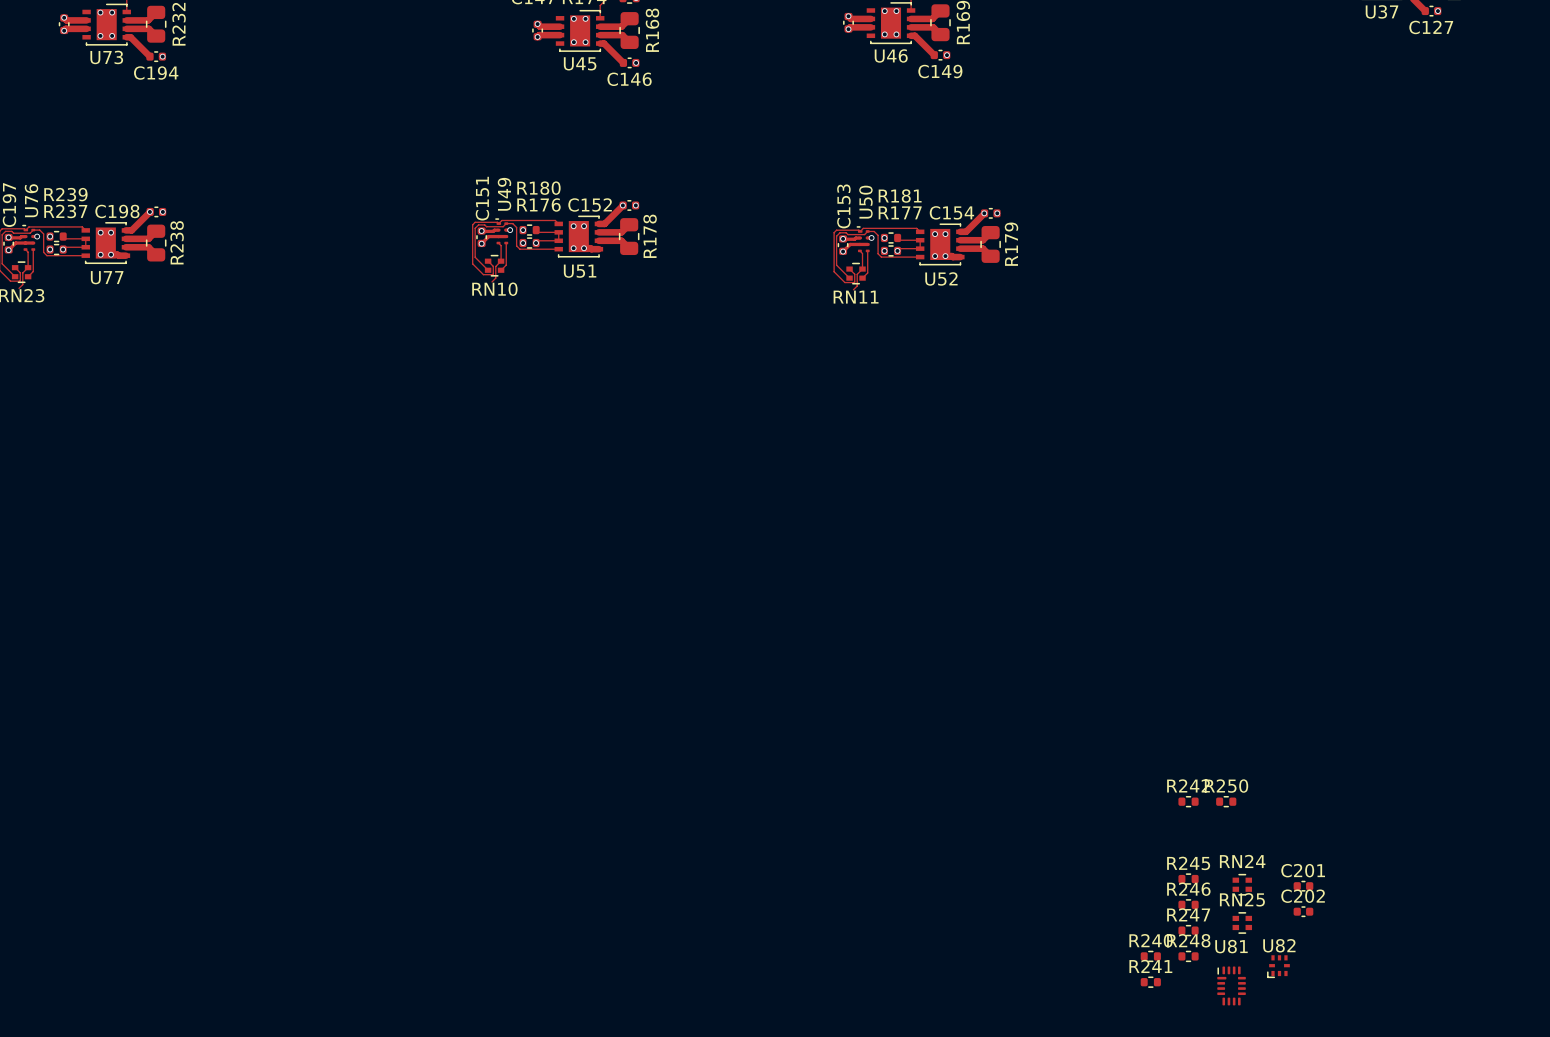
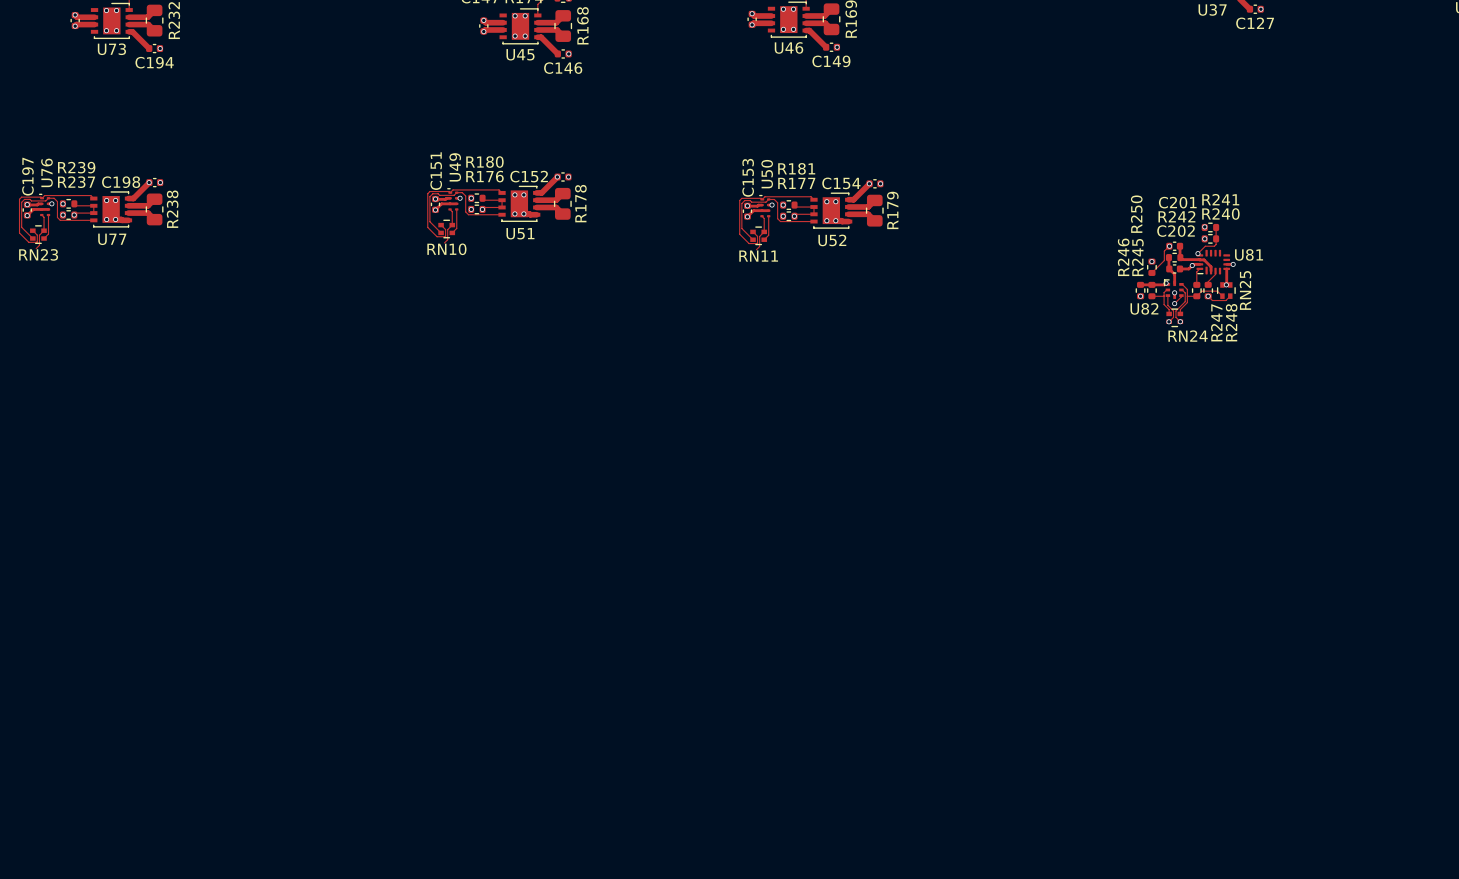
via: none -> (1204, 226)
top track: none -> (1216, 227) (1216, 244) (1205, 246) (1197, 253) (1199, 255)
via: none -> (1204, 238)
top track: none -> (1169, 246) (1164, 251) (1164, 260) (1151, 272)
via: none -> (1169, 246)
top track: none -> (1180, 246) (1180, 257) (1182, 259) (1204, 259) (1211, 266) (1211, 271)
via: none -> (1197, 253)
top track: none -> (1168, 257) (1168, 268) (1174, 274) (1174, 283)
via: none -> (1151, 261)
top track: none -> (1199, 264) (1193, 264) (1188, 268) (1180, 268)
top track: none -> (1226, 264) (1233, 264)
via: none -> (1233, 264)
via: none -> (1192, 265)
top track: none -> (1199, 268) (1196, 271) (1196, 284)
top track: none -> (1226, 268) (1226, 284) (1222, 284)
top track: none -> (1215, 271) (1215, 274) (1208, 281) (1208, 284)
via: none -> (1166, 283)
top track: none -> (1167, 284) (1140, 284)
top track: none -> (1181, 284) (1187, 289) (1187, 302) (1180, 309) (1180, 313)
via: none -> (1226, 284)
top track: none -> (1167, 289) (1164, 292) (1164, 304) (1169, 309) (1169, 313)
top track: none -> (1181, 289) (1185, 292) (1185, 301) (1175, 310) (1175, 317) (1180, 321)
via: none -> (1174, 292)
top track: none -> (1167, 295) (1167, 305) (1173, 311) (1173, 317) (1168, 321)
top track: none -> (1181, 295) (1174, 303)
via: none -> (1140, 296)
top track: none -> (1151, 296) (1164, 296)
via: none -> (1208, 296)
top track: none -> (1222, 296) (1217, 291) (1201, 291) (1196, 296) (1187, 296)
top track: none -> (1230, 296) (1225, 300) (1212, 300) (1208, 296)
via: none -> (1174, 303)
via: none -> (1168, 321)
via: none -> (1180, 321)
R242 name position: R242 (1188, 785) -> R242 (1176, 216)
R250 name position: R250 (1226, 786) -> R250 (1136, 214)
R242 position: (1188, 801) -> (1174, 257)
R250 rotation: 0° (1226, 801) -> 90° clockwise (1151, 267)
R250 position: (1226, 801) -> (1151, 267)
RN24 name position: RN24 (1242, 861) -> RN24 (1188, 336)
R245 name position: R245 (1188, 863) -> R245 (1137, 257)
C201 name position: C201 (1303, 870) -> C201 (1177, 202)
R245 rotation: 0° (1188, 879) -> 90° clockwise (1151, 290)
R245 position: (1188, 879) -> (1151, 290)
RN24 position: (1242, 884) -> (1174, 317)
C201 position: (1303, 886) -> (1174, 246)
R246 name position: R246 (1188, 889) -> R246 (1123, 257)
C202 name position: C202 (1303, 896) -> C202 (1176, 231)
R246 rotation: 0° (1188, 904) -> 90° clockwise (1140, 290)
R246 position: (1188, 904) -> (1140, 290)
C202 position: (1303, 911) -> (1174, 268)
R247 name position: R247 (1188, 914) -> R247 (1216, 322)
RN25 rotation: 0° (1242, 922) -> 90° clockwise (1226, 290)
RN25 position: (1242, 922) -> (1226, 290)
R247 rotation: 0° (1188, 930) -> 90° clockwise (1196, 290)
R247 position: (1188, 930) -> (1196, 290)
R240 name position: R240 (1151, 940) -> R240 (1220, 214)
R248 name position: R248 (1188, 940) -> R248 (1231, 322)
U82 name position: U82 (1279, 945) -> U82 (1144, 308)
U81 name position: U81 (1231, 946) -> U81 (1249, 254)
R240 position: (1150, 956) -> (1210, 238)
R248 rotation: 0° (1188, 956) -> 90° clockwise (1208, 290)
R248 position: (1188, 956) -> (1208, 290)
R241 name position: R241 (1150, 966) -> R241 (1220, 199)
U82 rotation: 0° (1278, 966) -> 90° clockwise (1173, 289)
U82 position: (1278, 966) -> (1173, 289)
R241 position: (1150, 982) -> (1210, 227)
U81 rotation: 0° (1231, 985) -> 90° counterclockwise (1213, 262)
U81 position: (1231, 985) -> (1213, 262)

